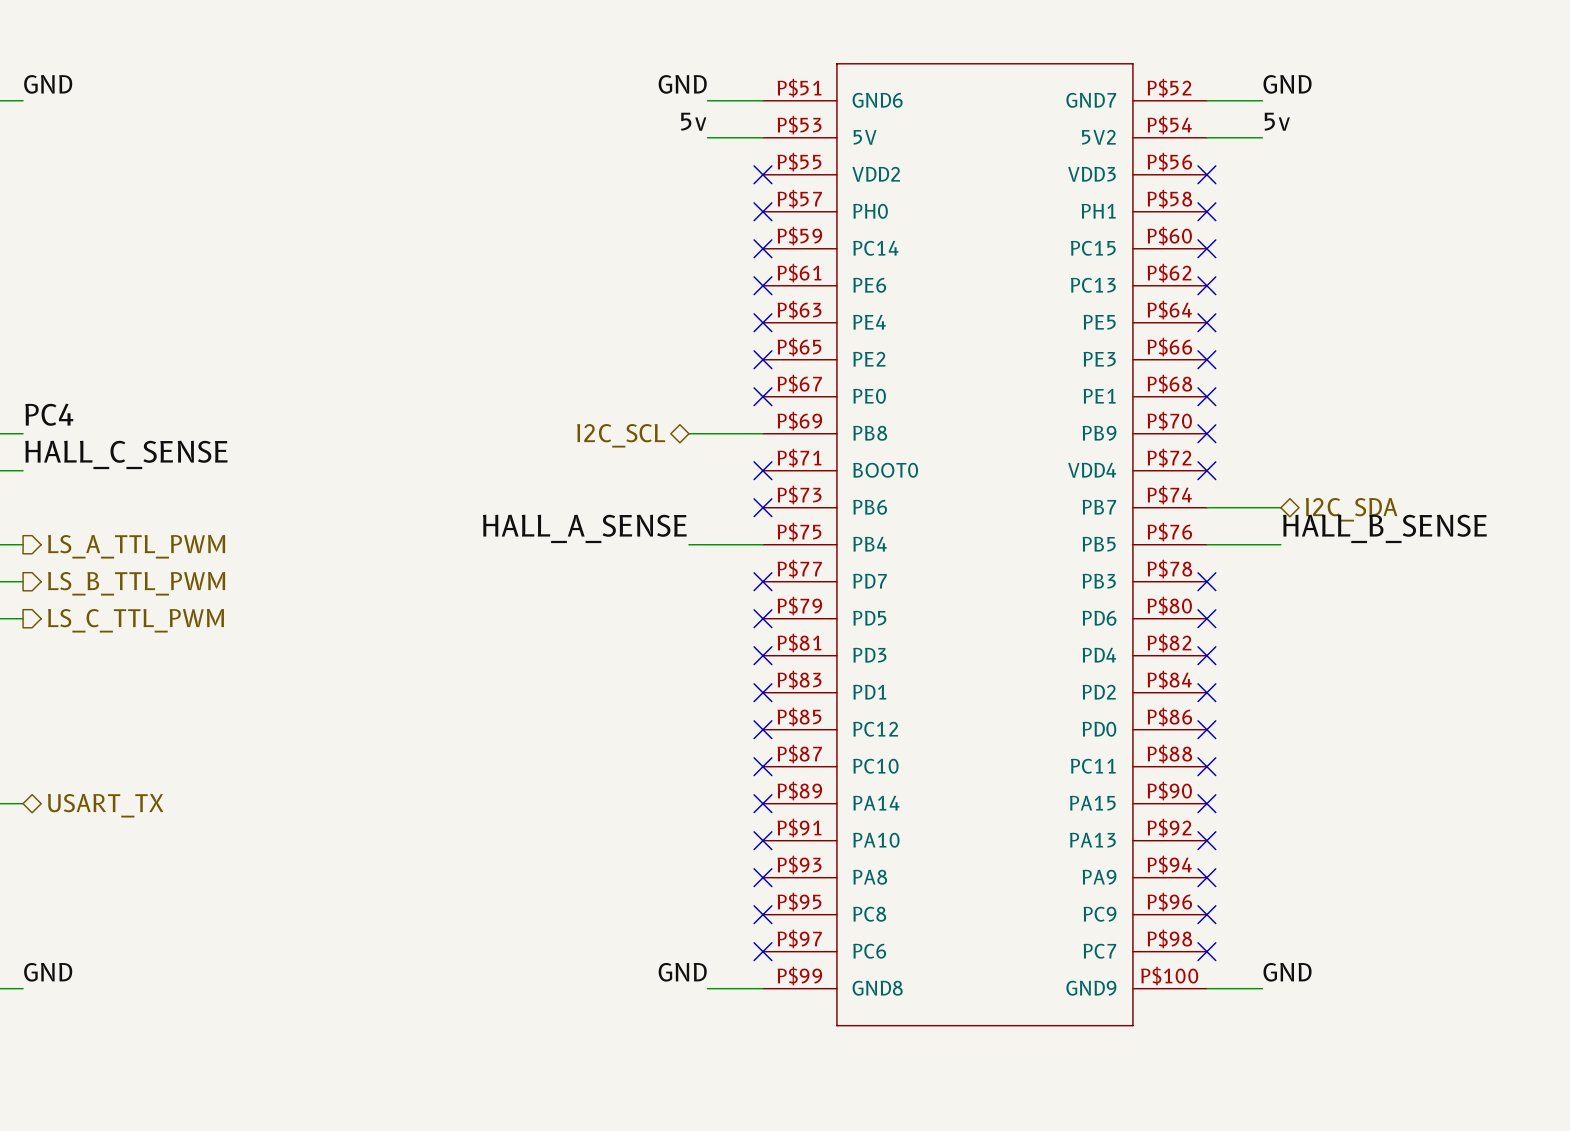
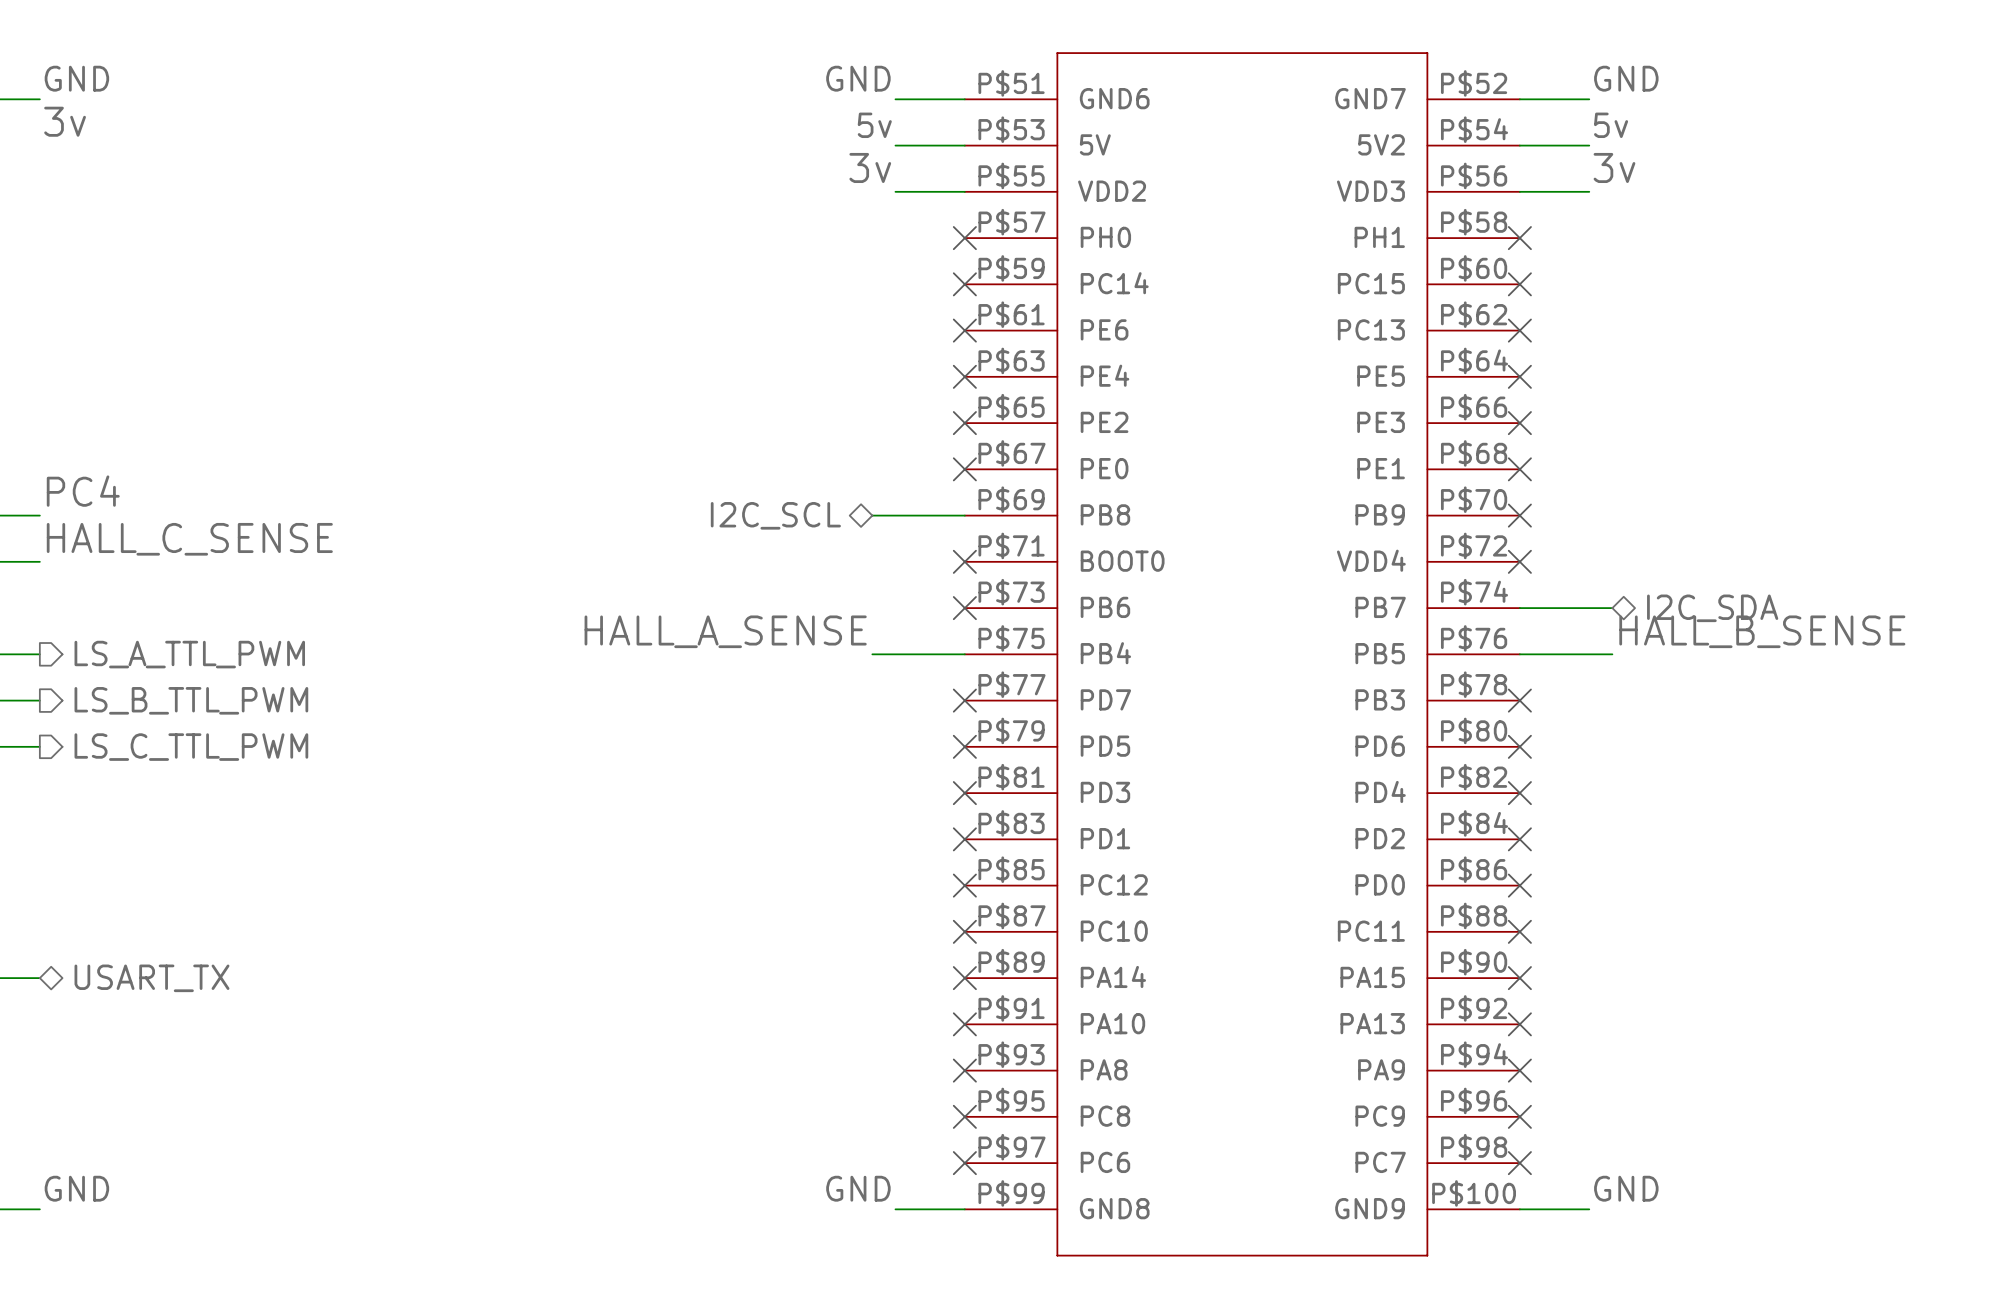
label: none -> 3v (65, 121)
label: none -> 3v (870, 167)
label: none -> 3v (1614, 167)
wire: none -> (895, 191) (964, 191)
no-connect mark: (762, 174) -> none
wire: none -> (1519, 191) (1589, 191)
no-connect mark: (1206, 174) -> none

